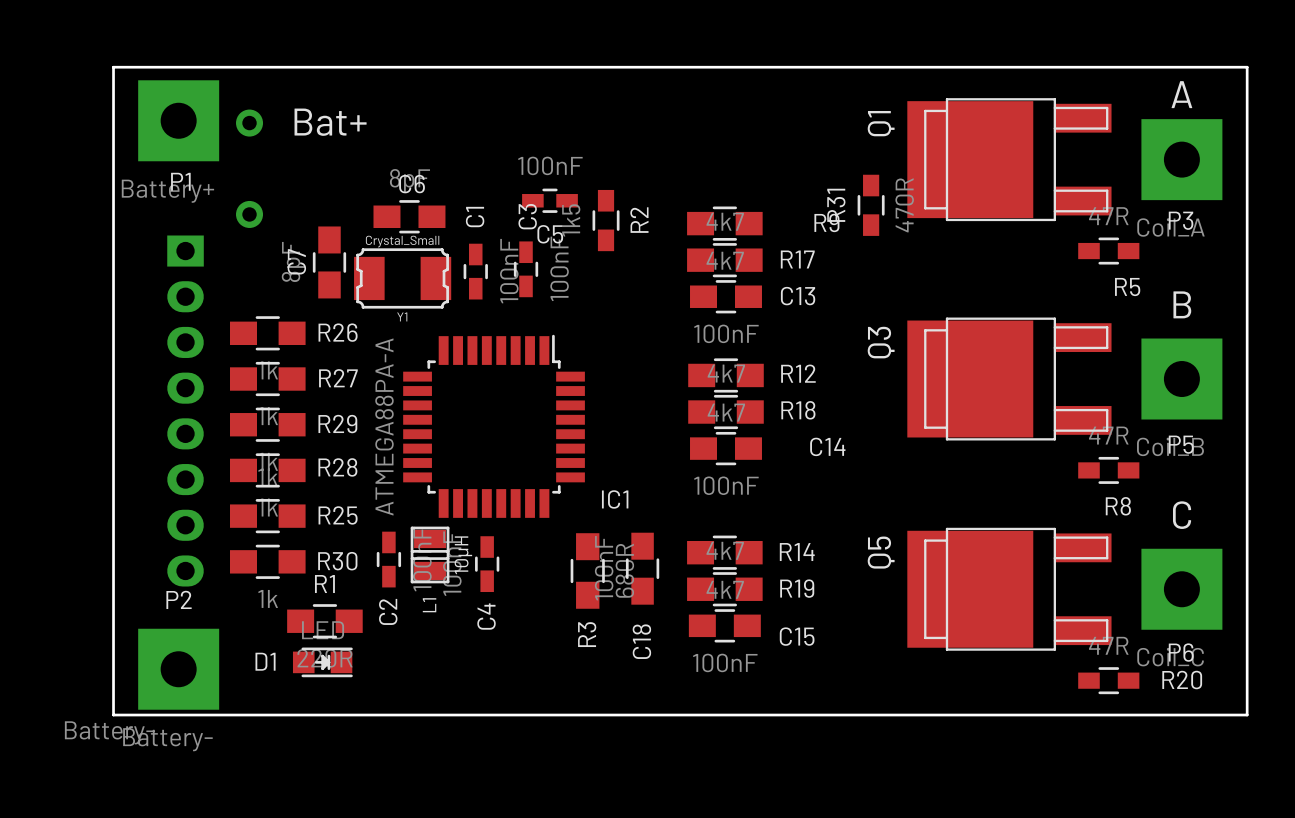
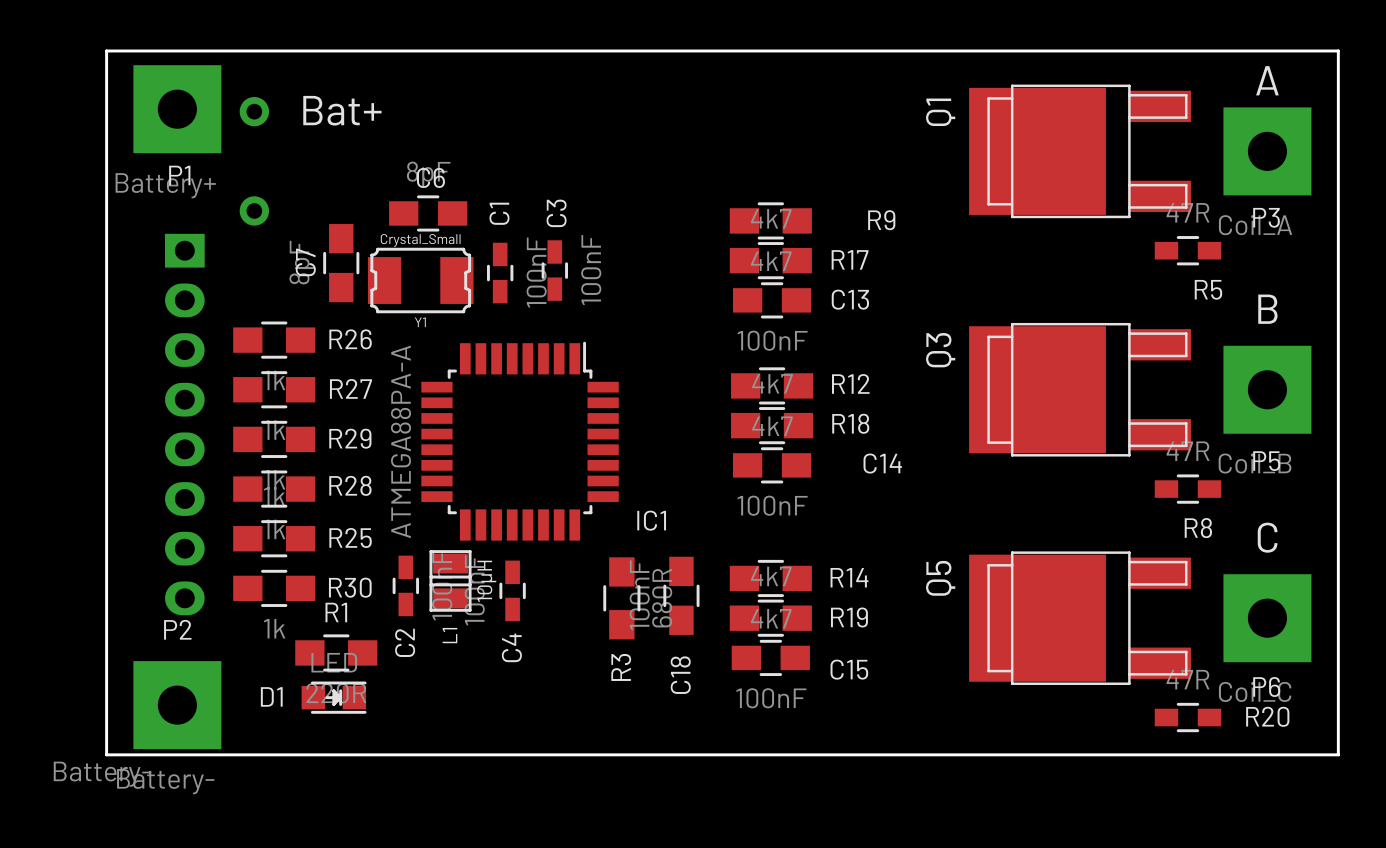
C5: 100nF (549, 200) -> none
R31: 470R (871, 205) -> none
R2: 1k5 (606, 220) -> none

